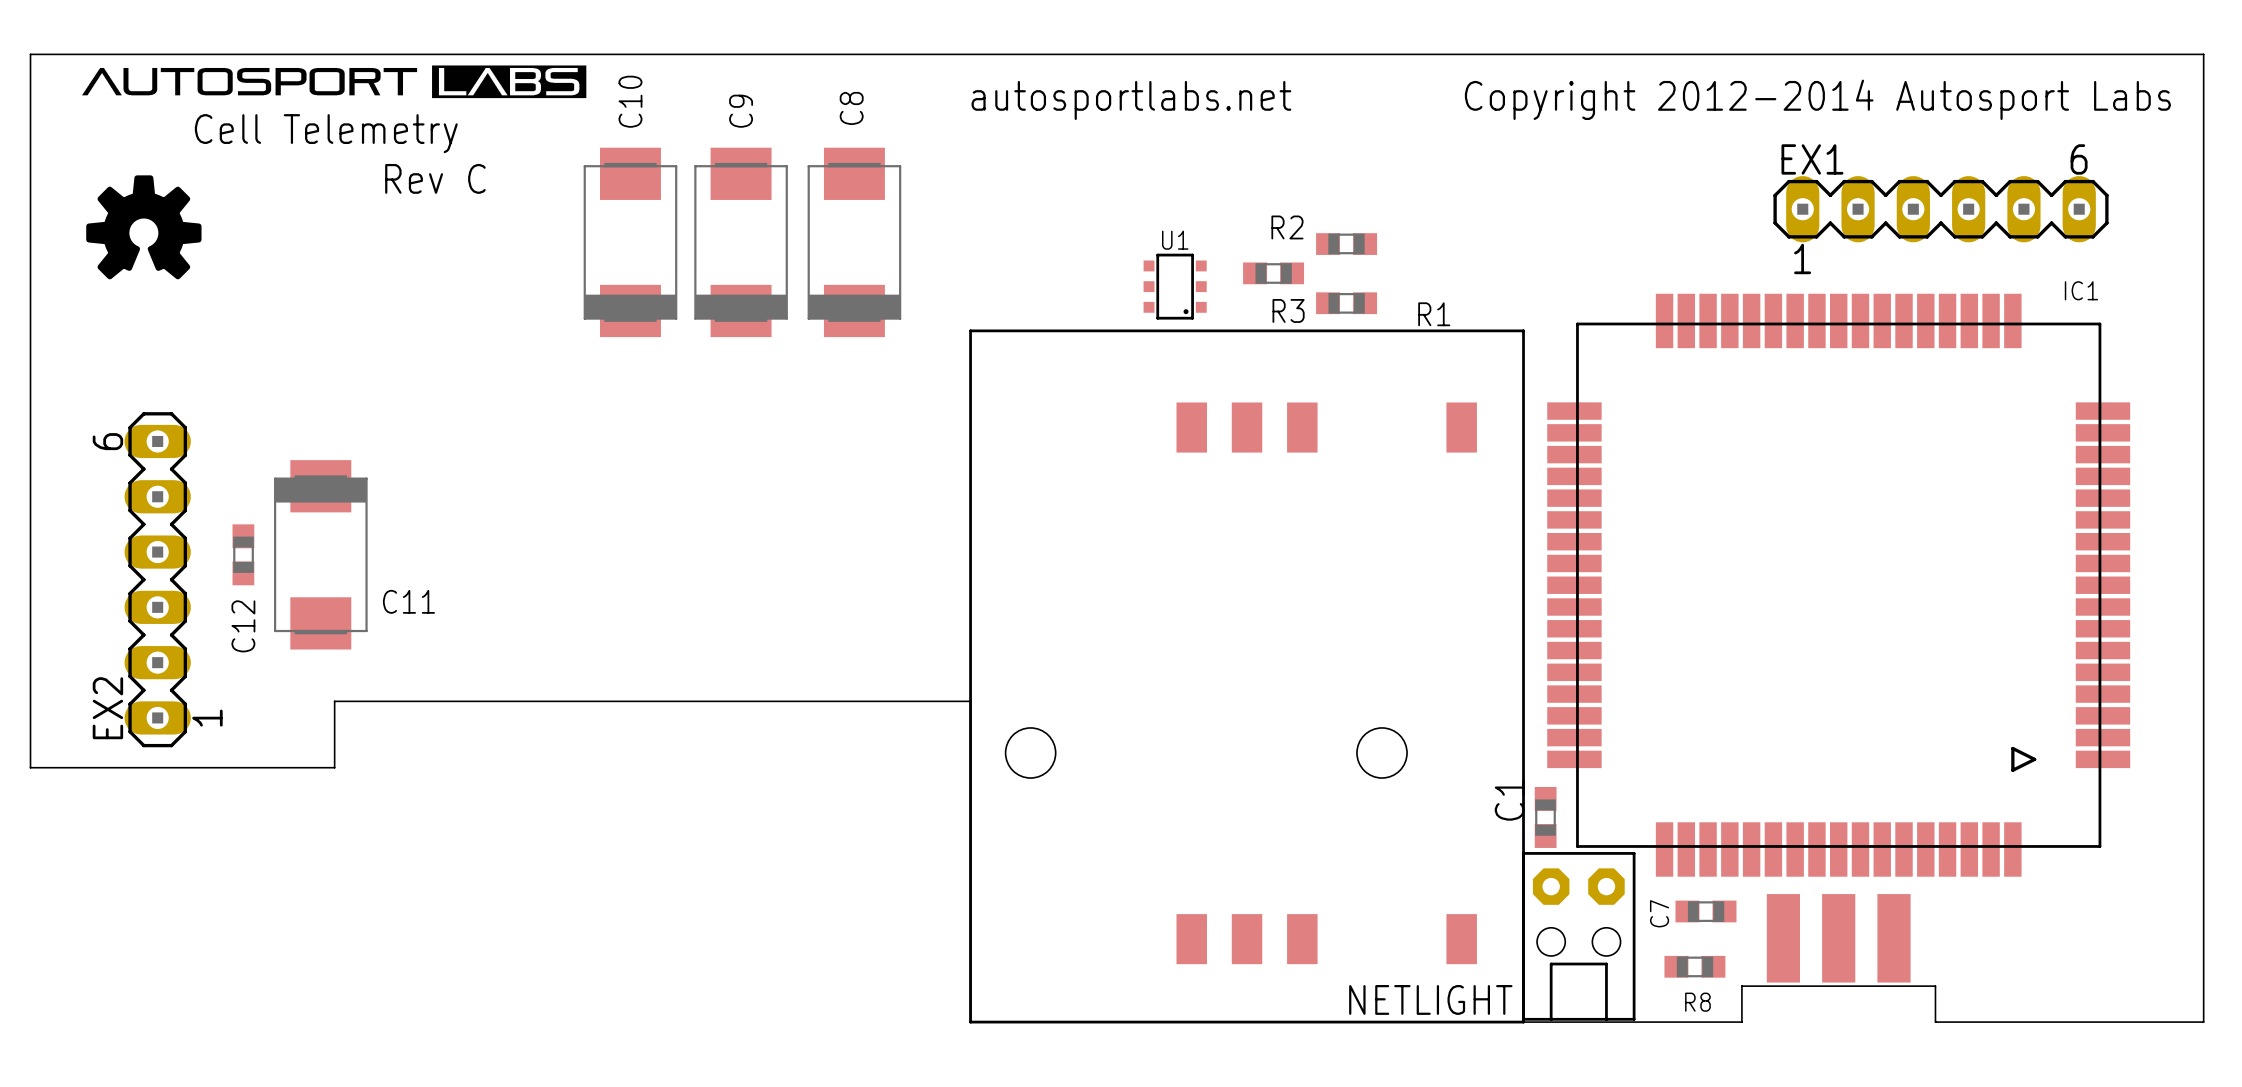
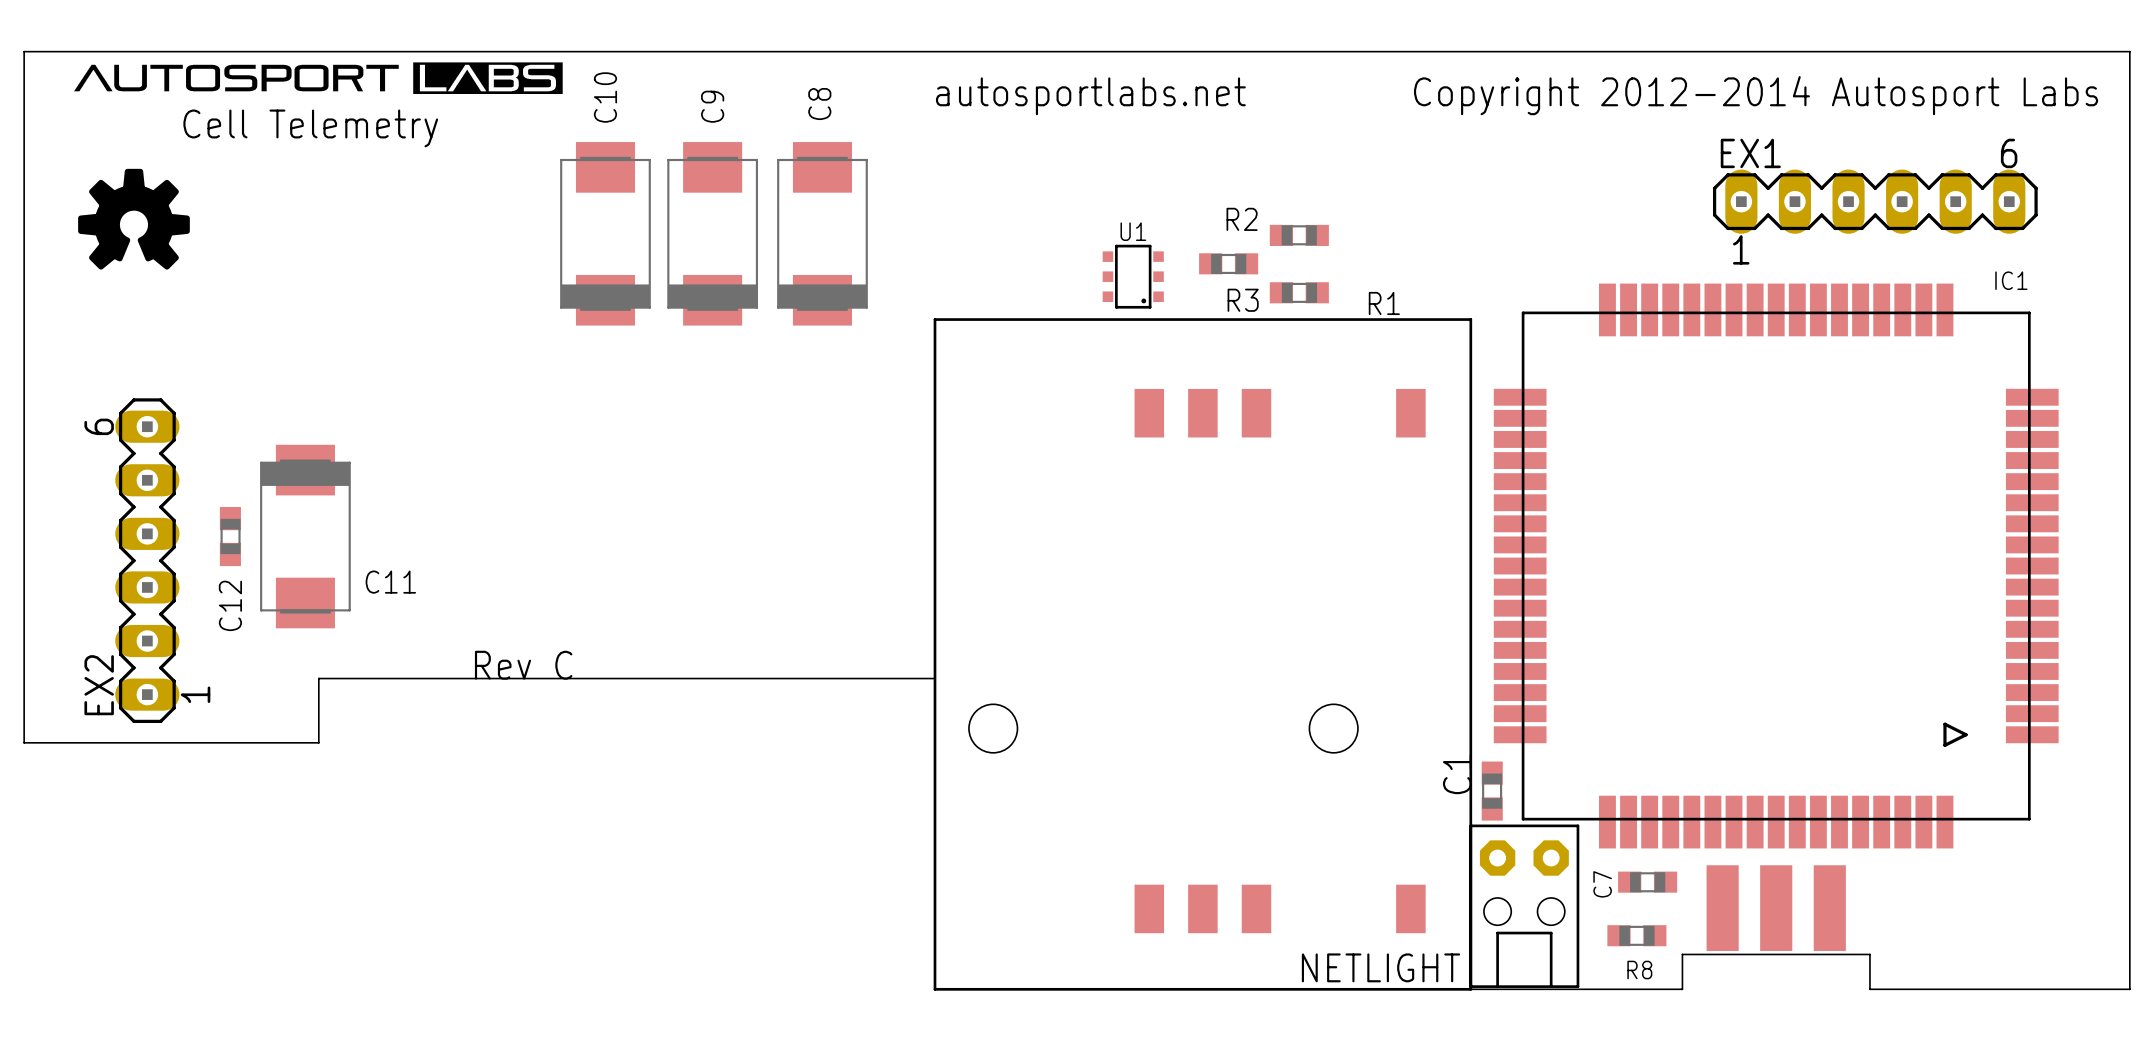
text position: Rev C (435, 178) -> Rev C (523, 665)

